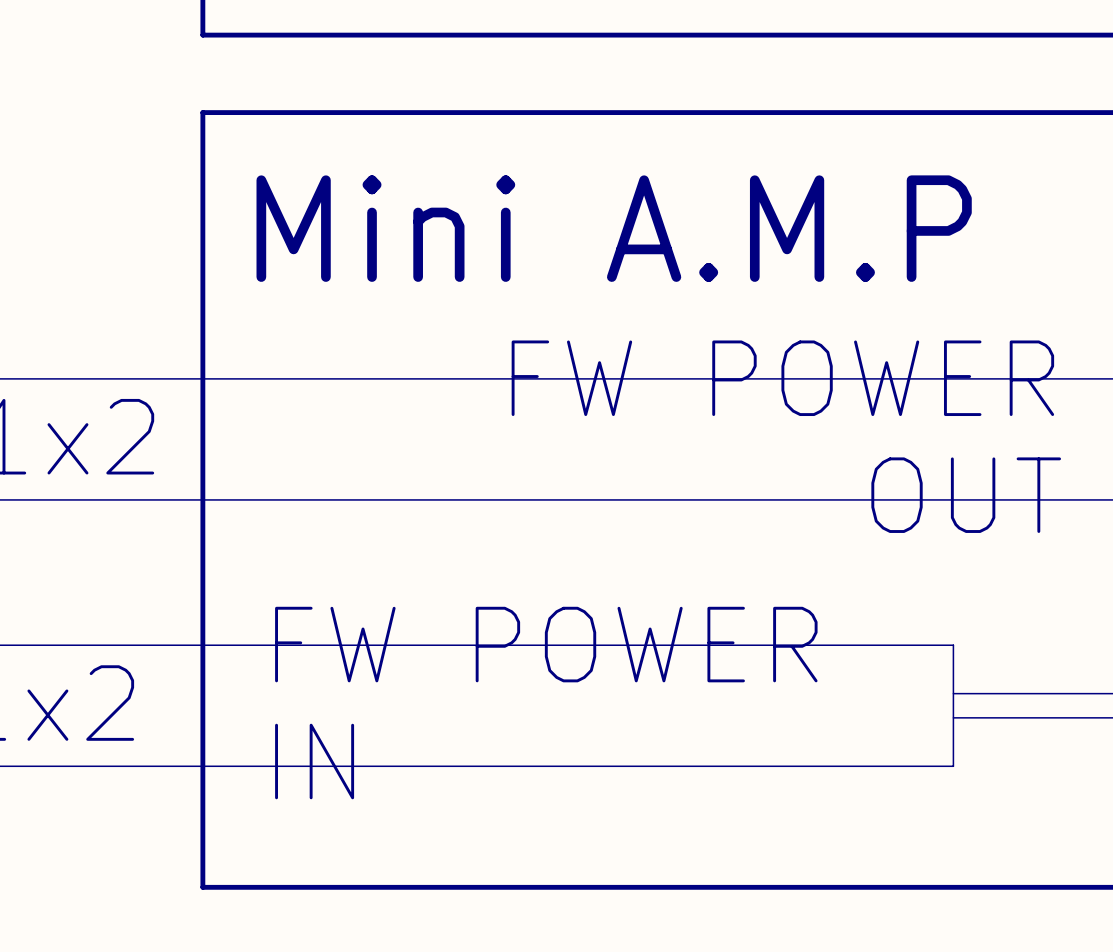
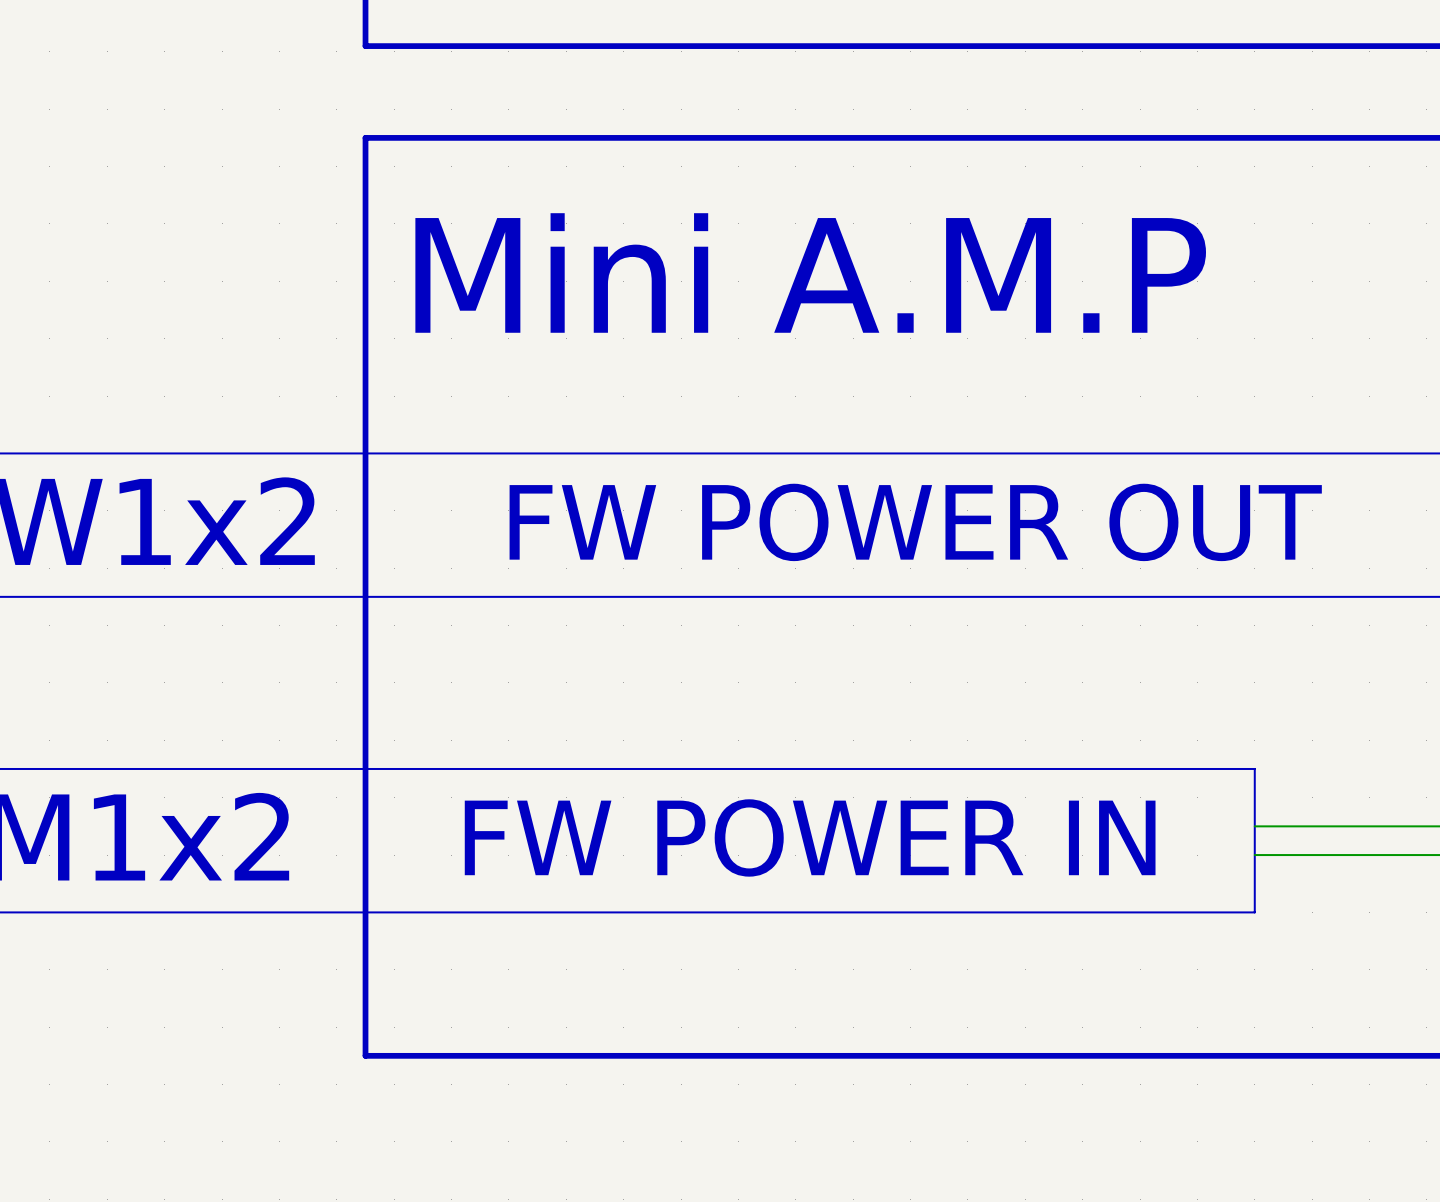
text: FW POWER (782, 378) -> FW POWER OUT (915, 522)
text: OUT (966, 495) -> none
text: FW POWER (546, 644) -> FW POWER IN (810, 837)
text: IN (314, 761) -> none

